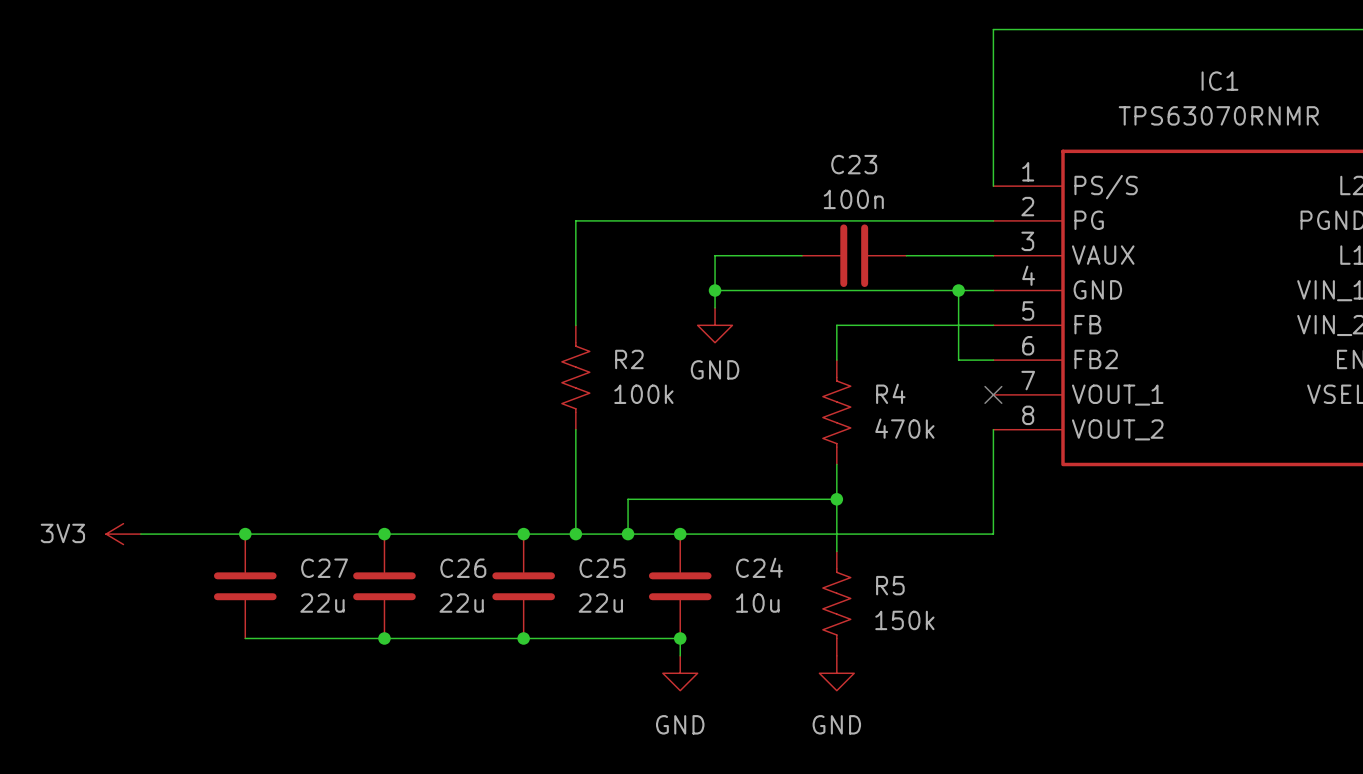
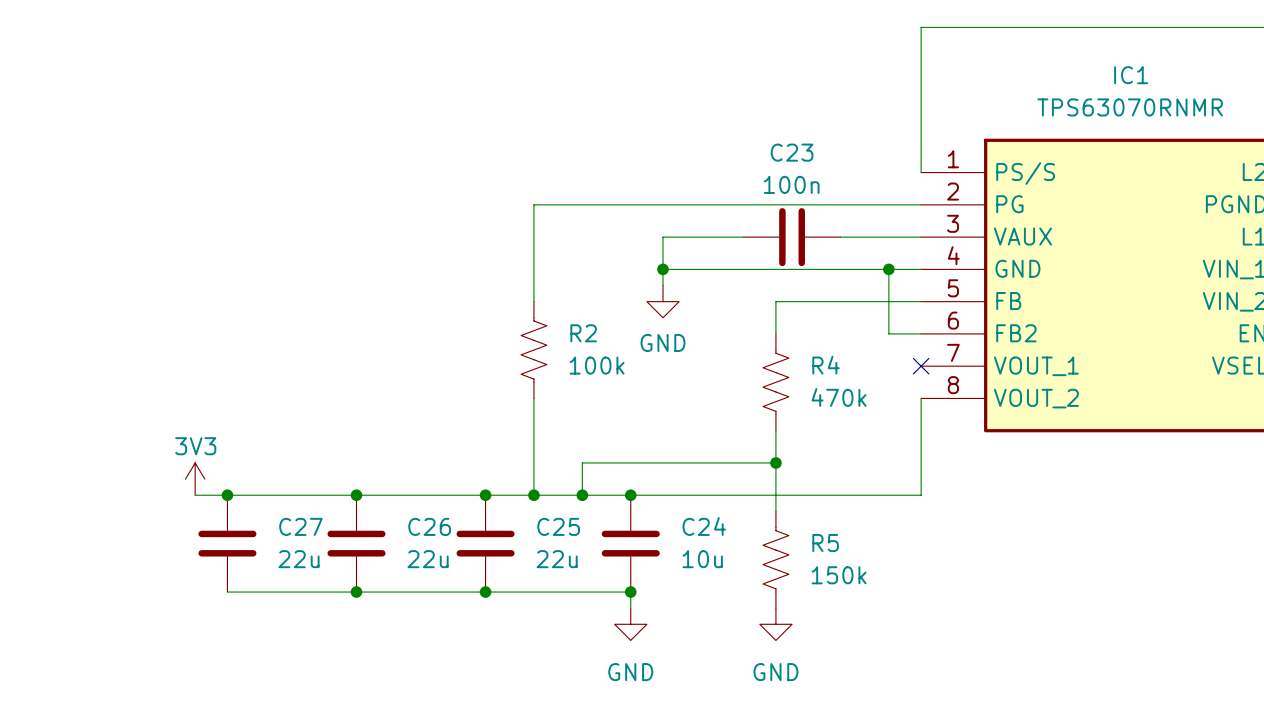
power symbol text position: 3V3 (62, 533) -> 3V3 (195, 446)
power symbol rotation: 0° (123, 534) -> 90° clockwise (195, 479)
power symbol position: 3V3 (123, 534) -> 3V3 (195, 479)
wire: (140, 534) (210, 534) -> none

